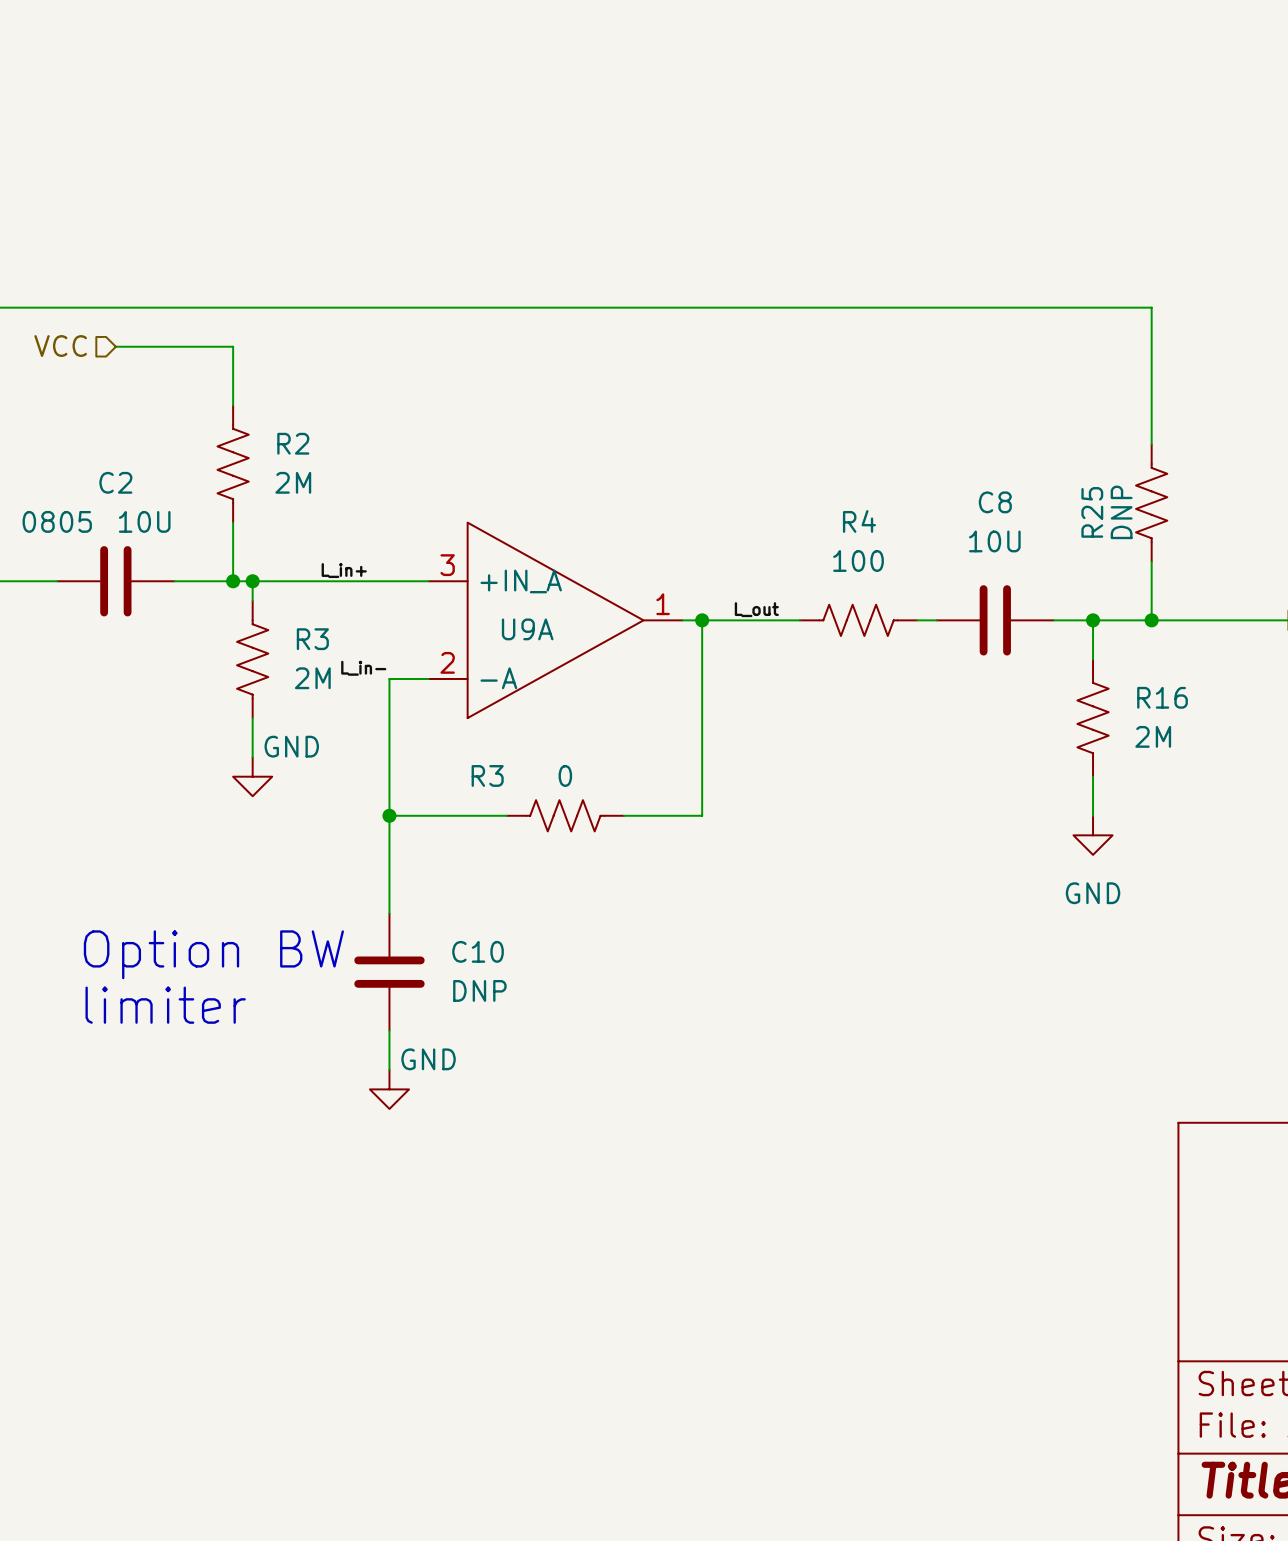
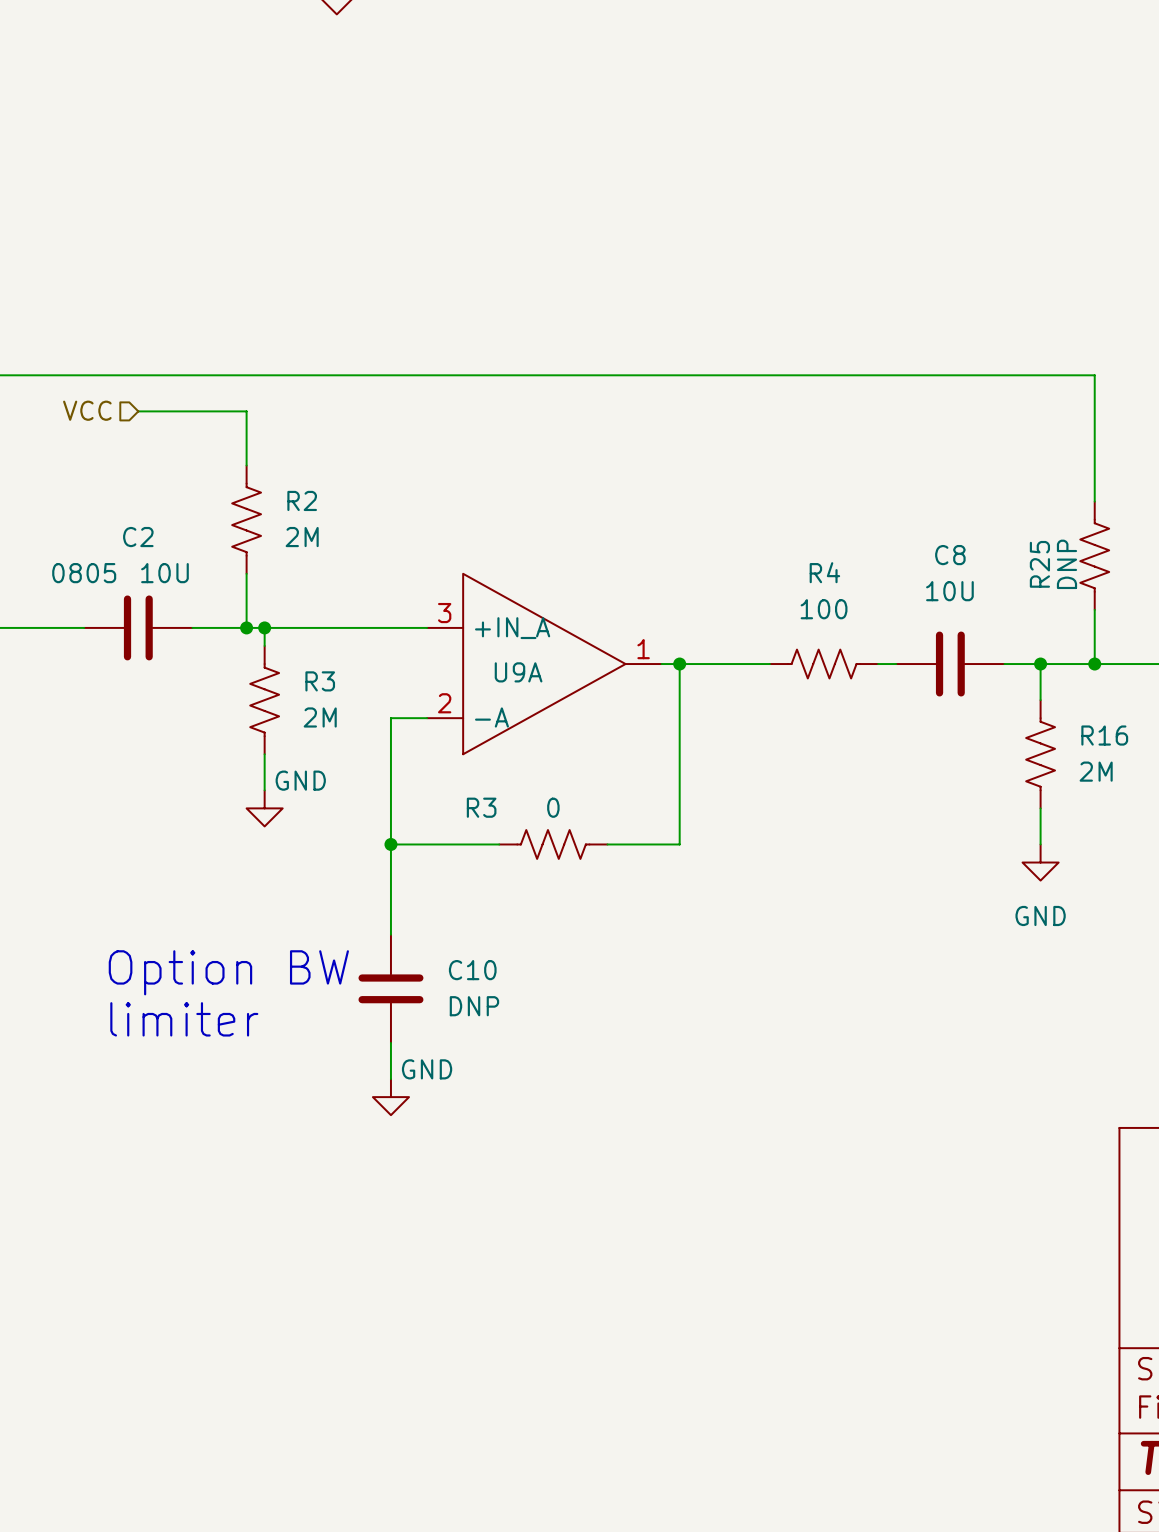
label: L_in+ (344, 570) -> none
label: L_out (756, 609) -> none
label: L_in- (363, 668) -> none

